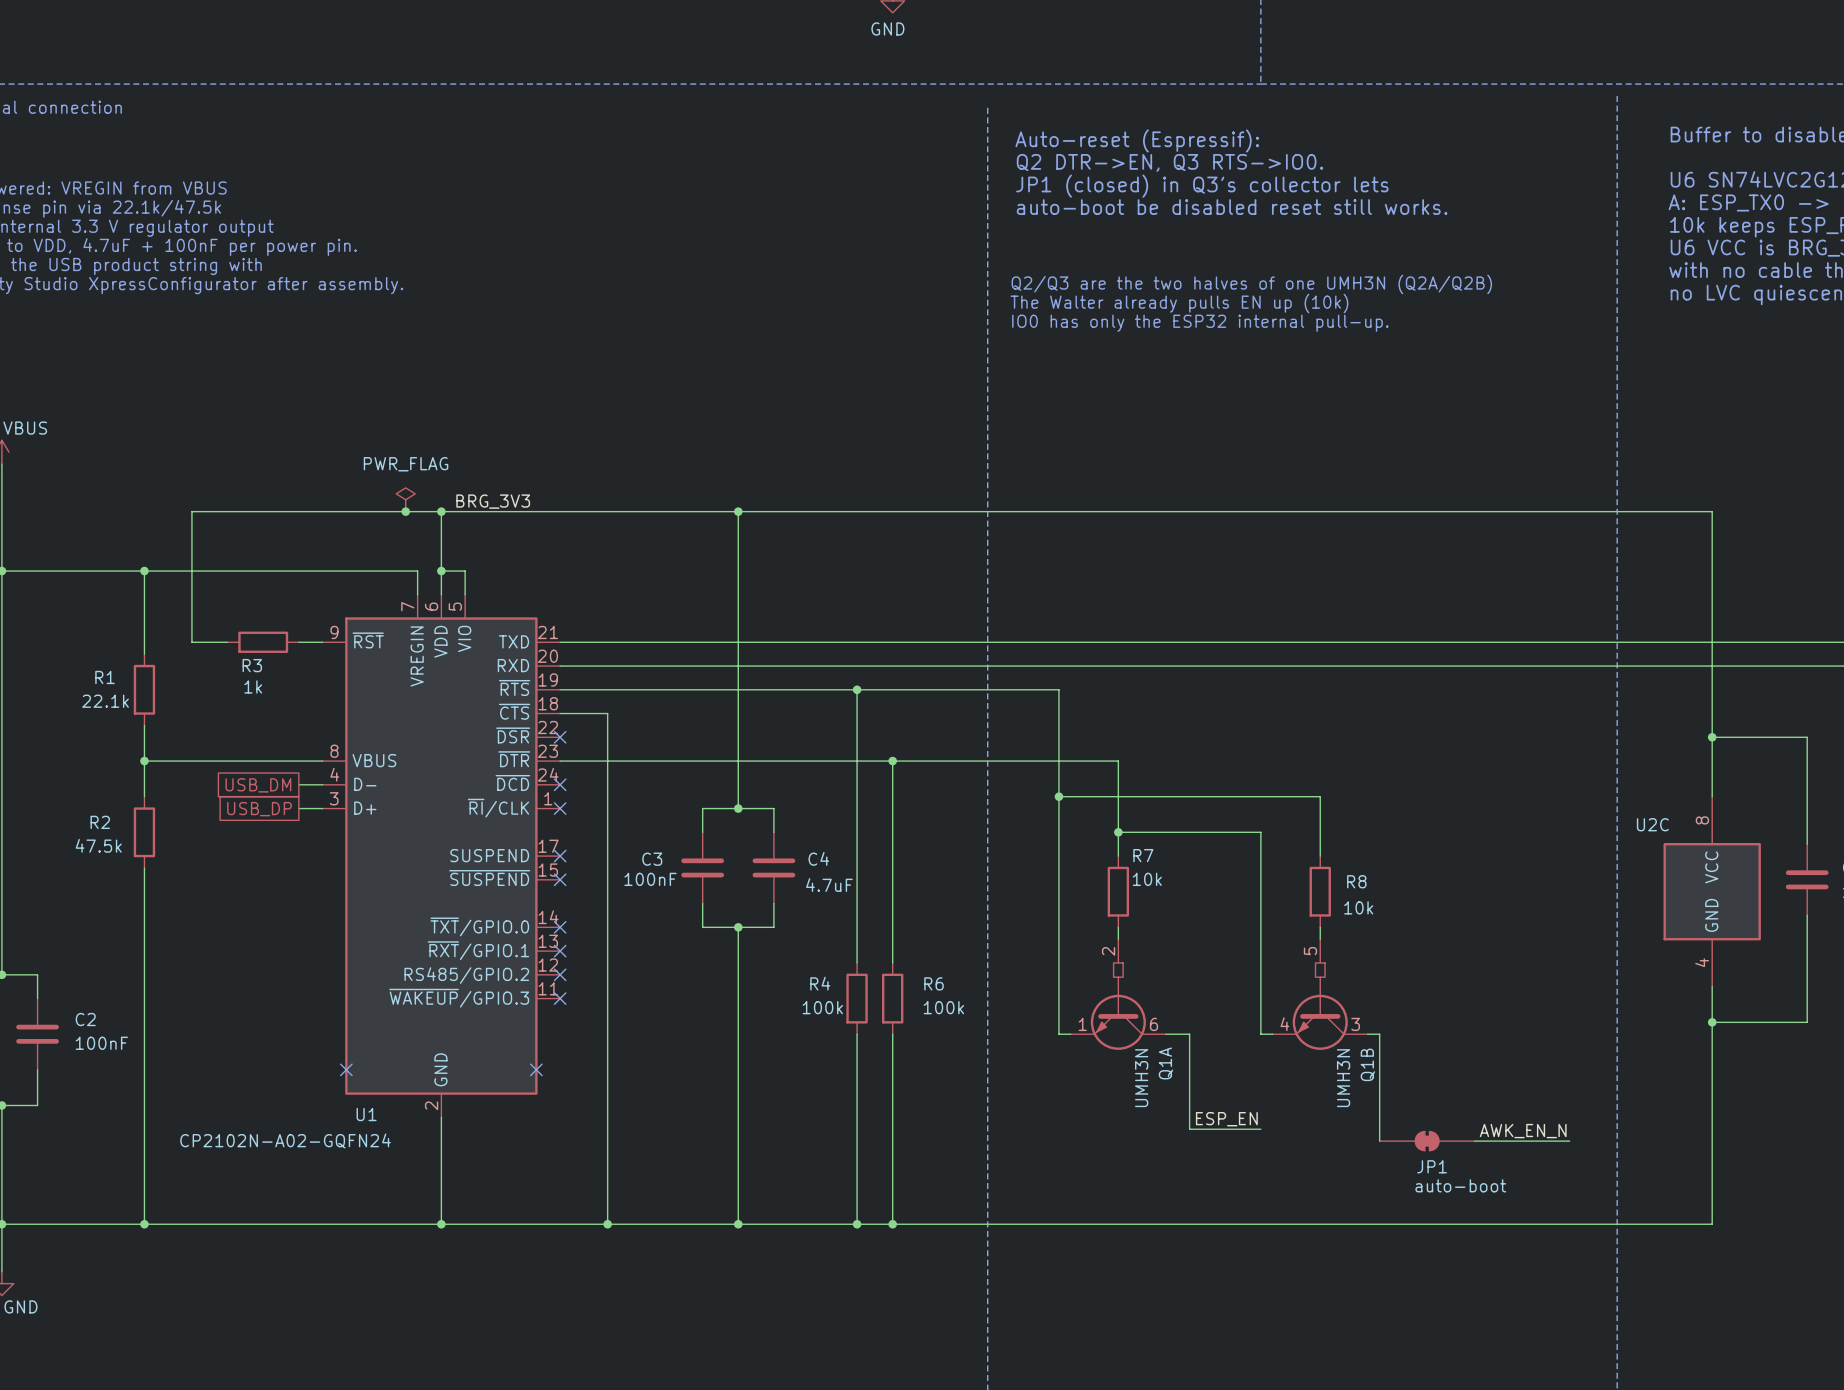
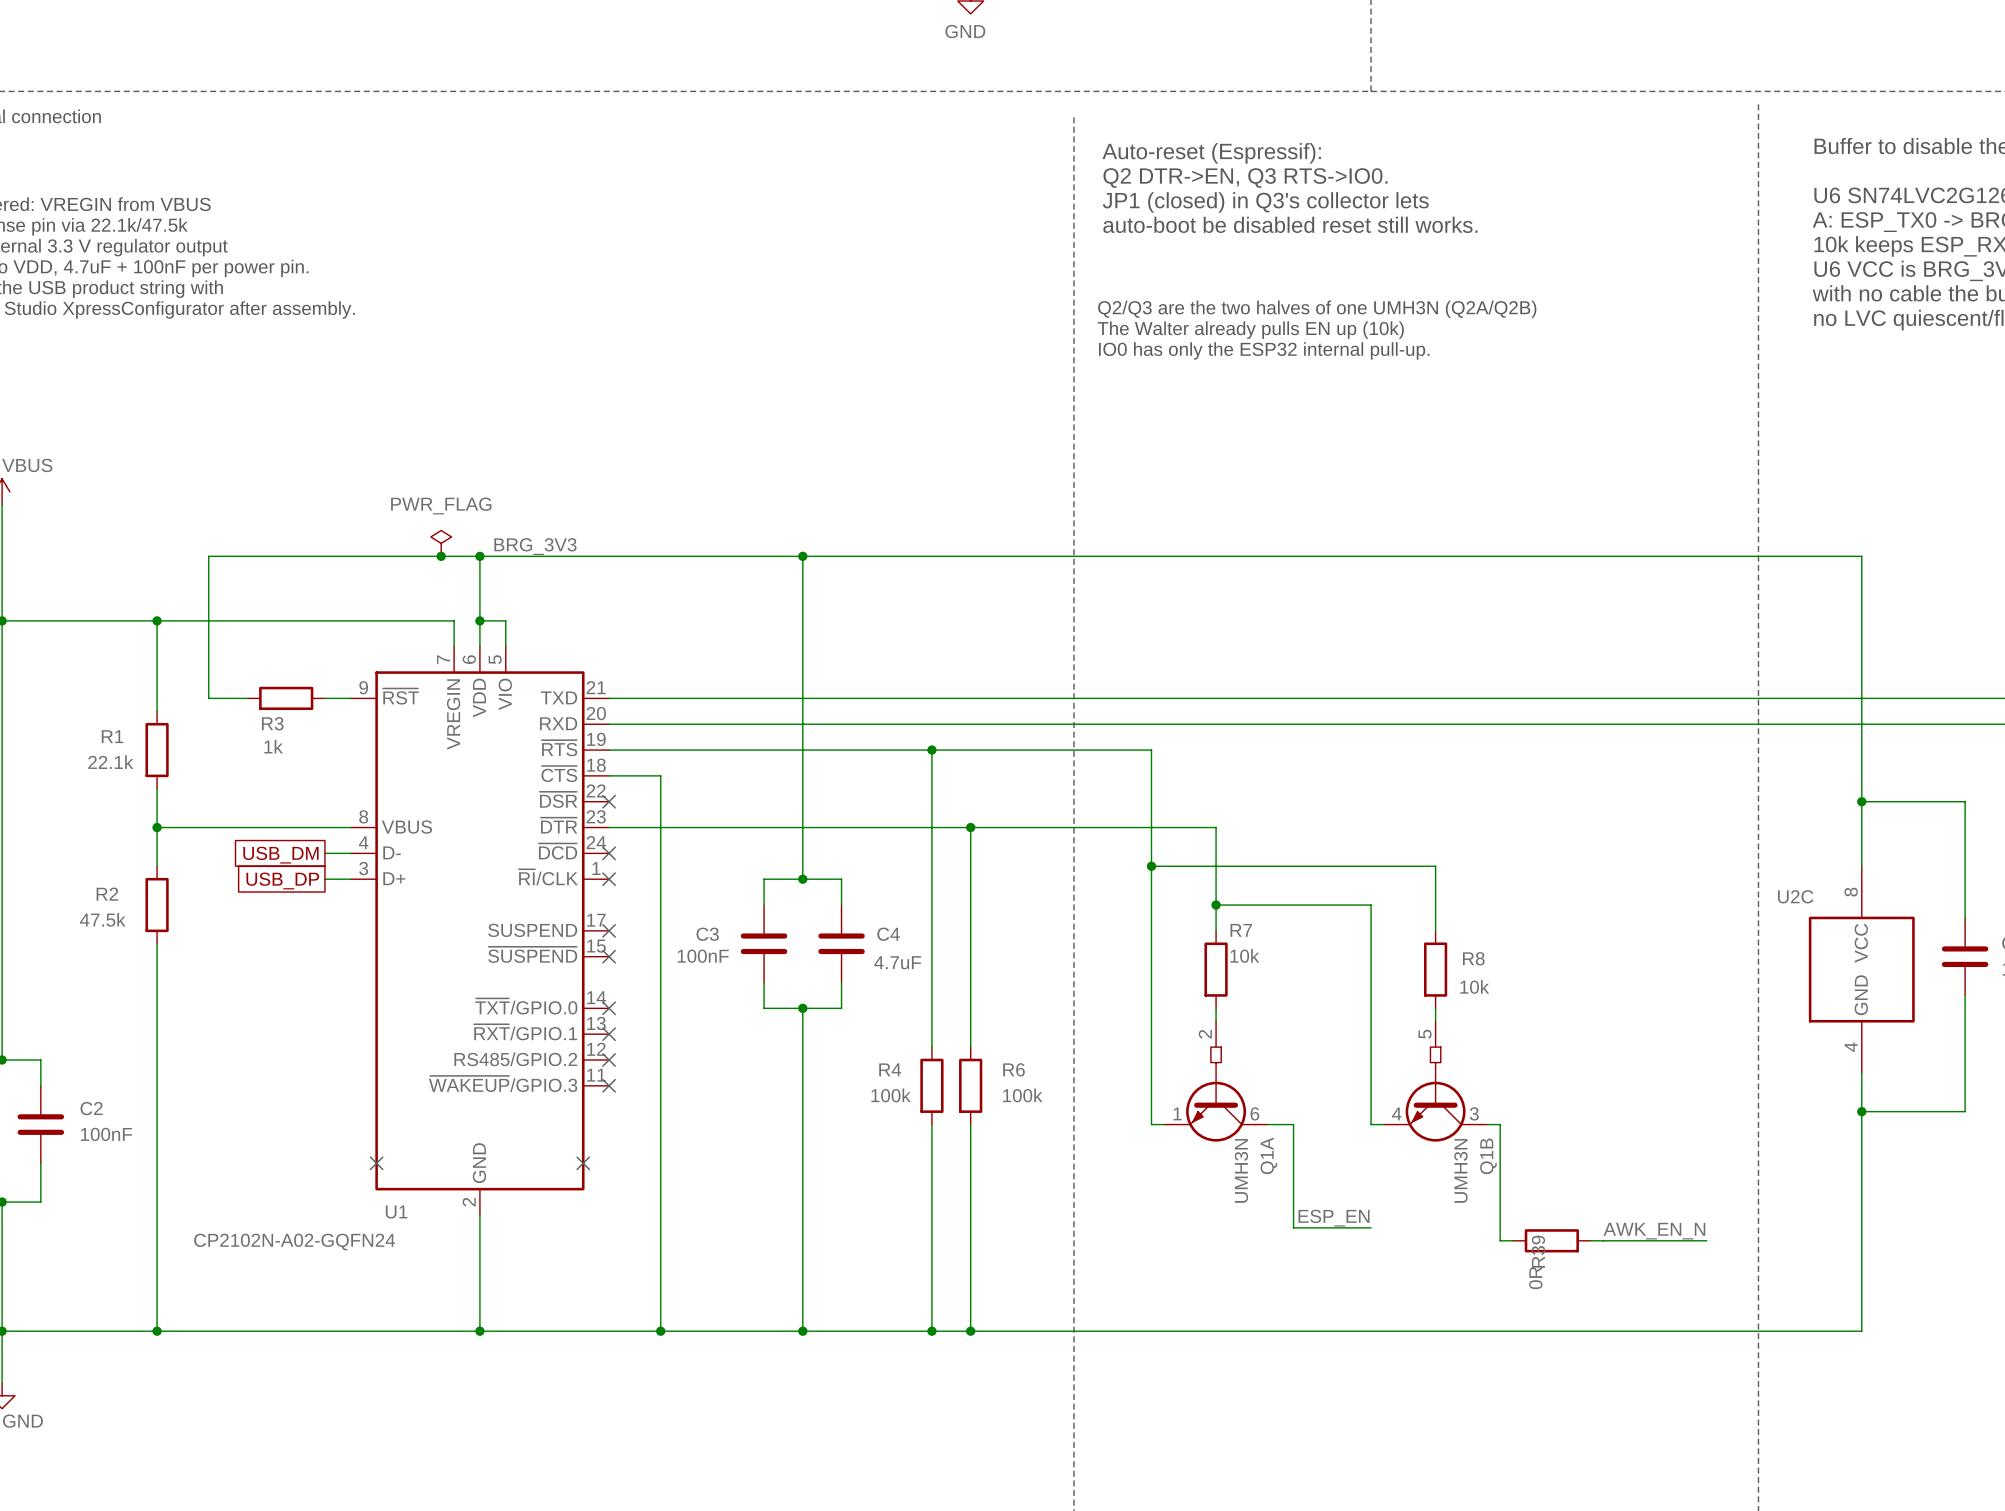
JP1: auto-boot (1427, 1141) -> none
R39: none -> 0R (1551, 1240)

